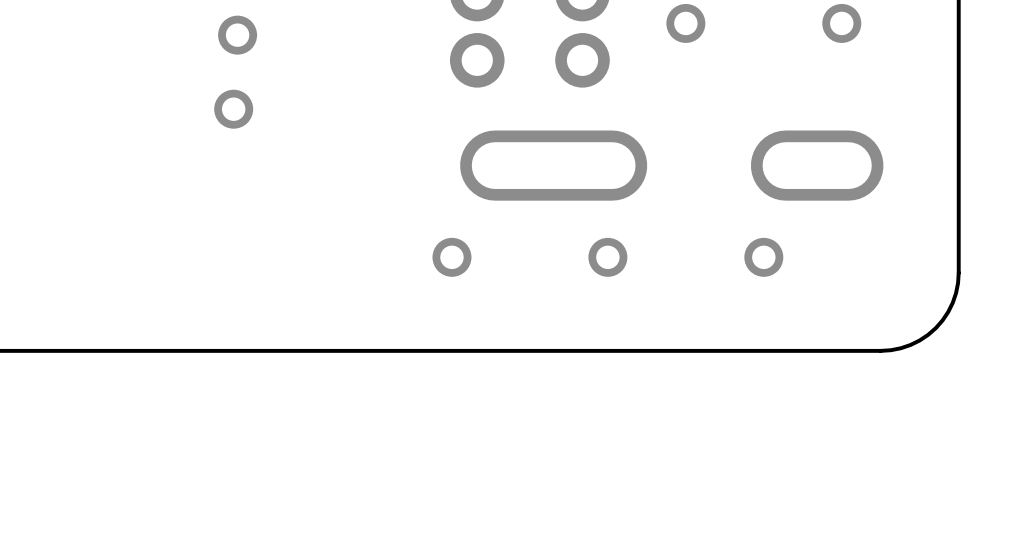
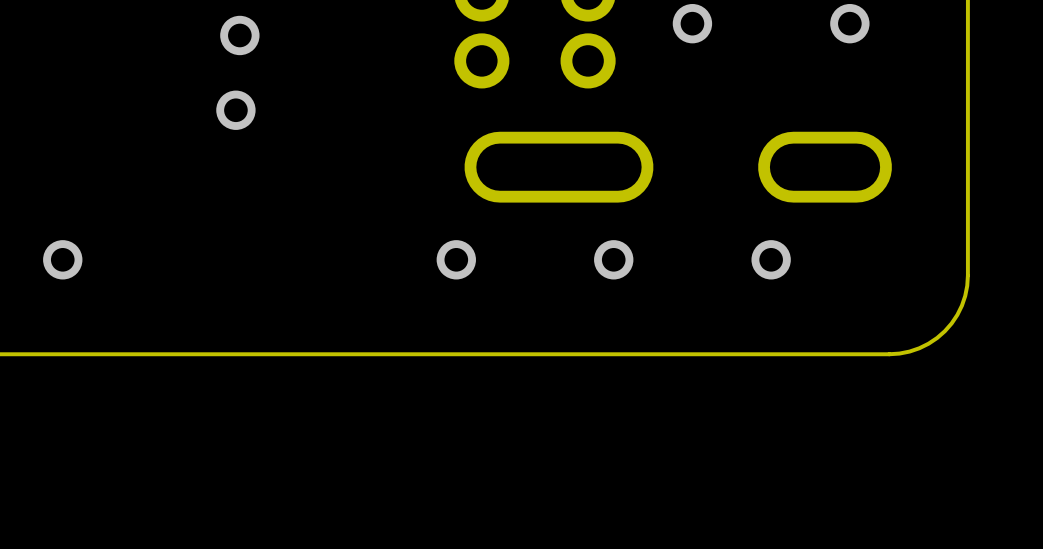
via: none -> (62, 259)

